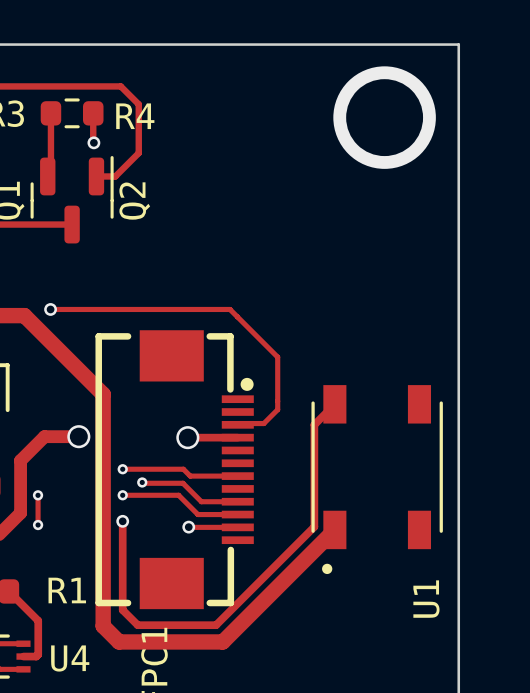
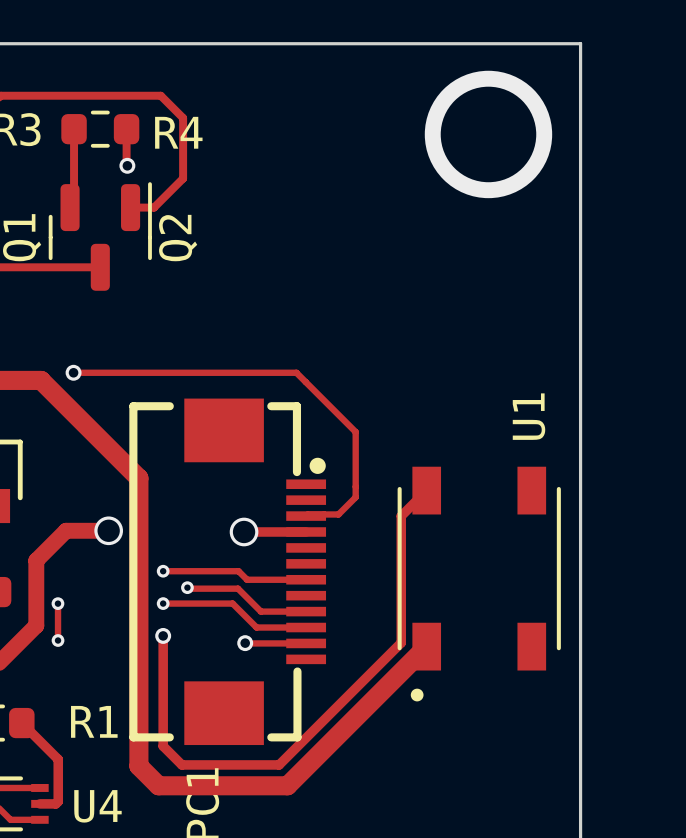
U1 name position: U1 (426, 599) -> U1 (529, 416)

